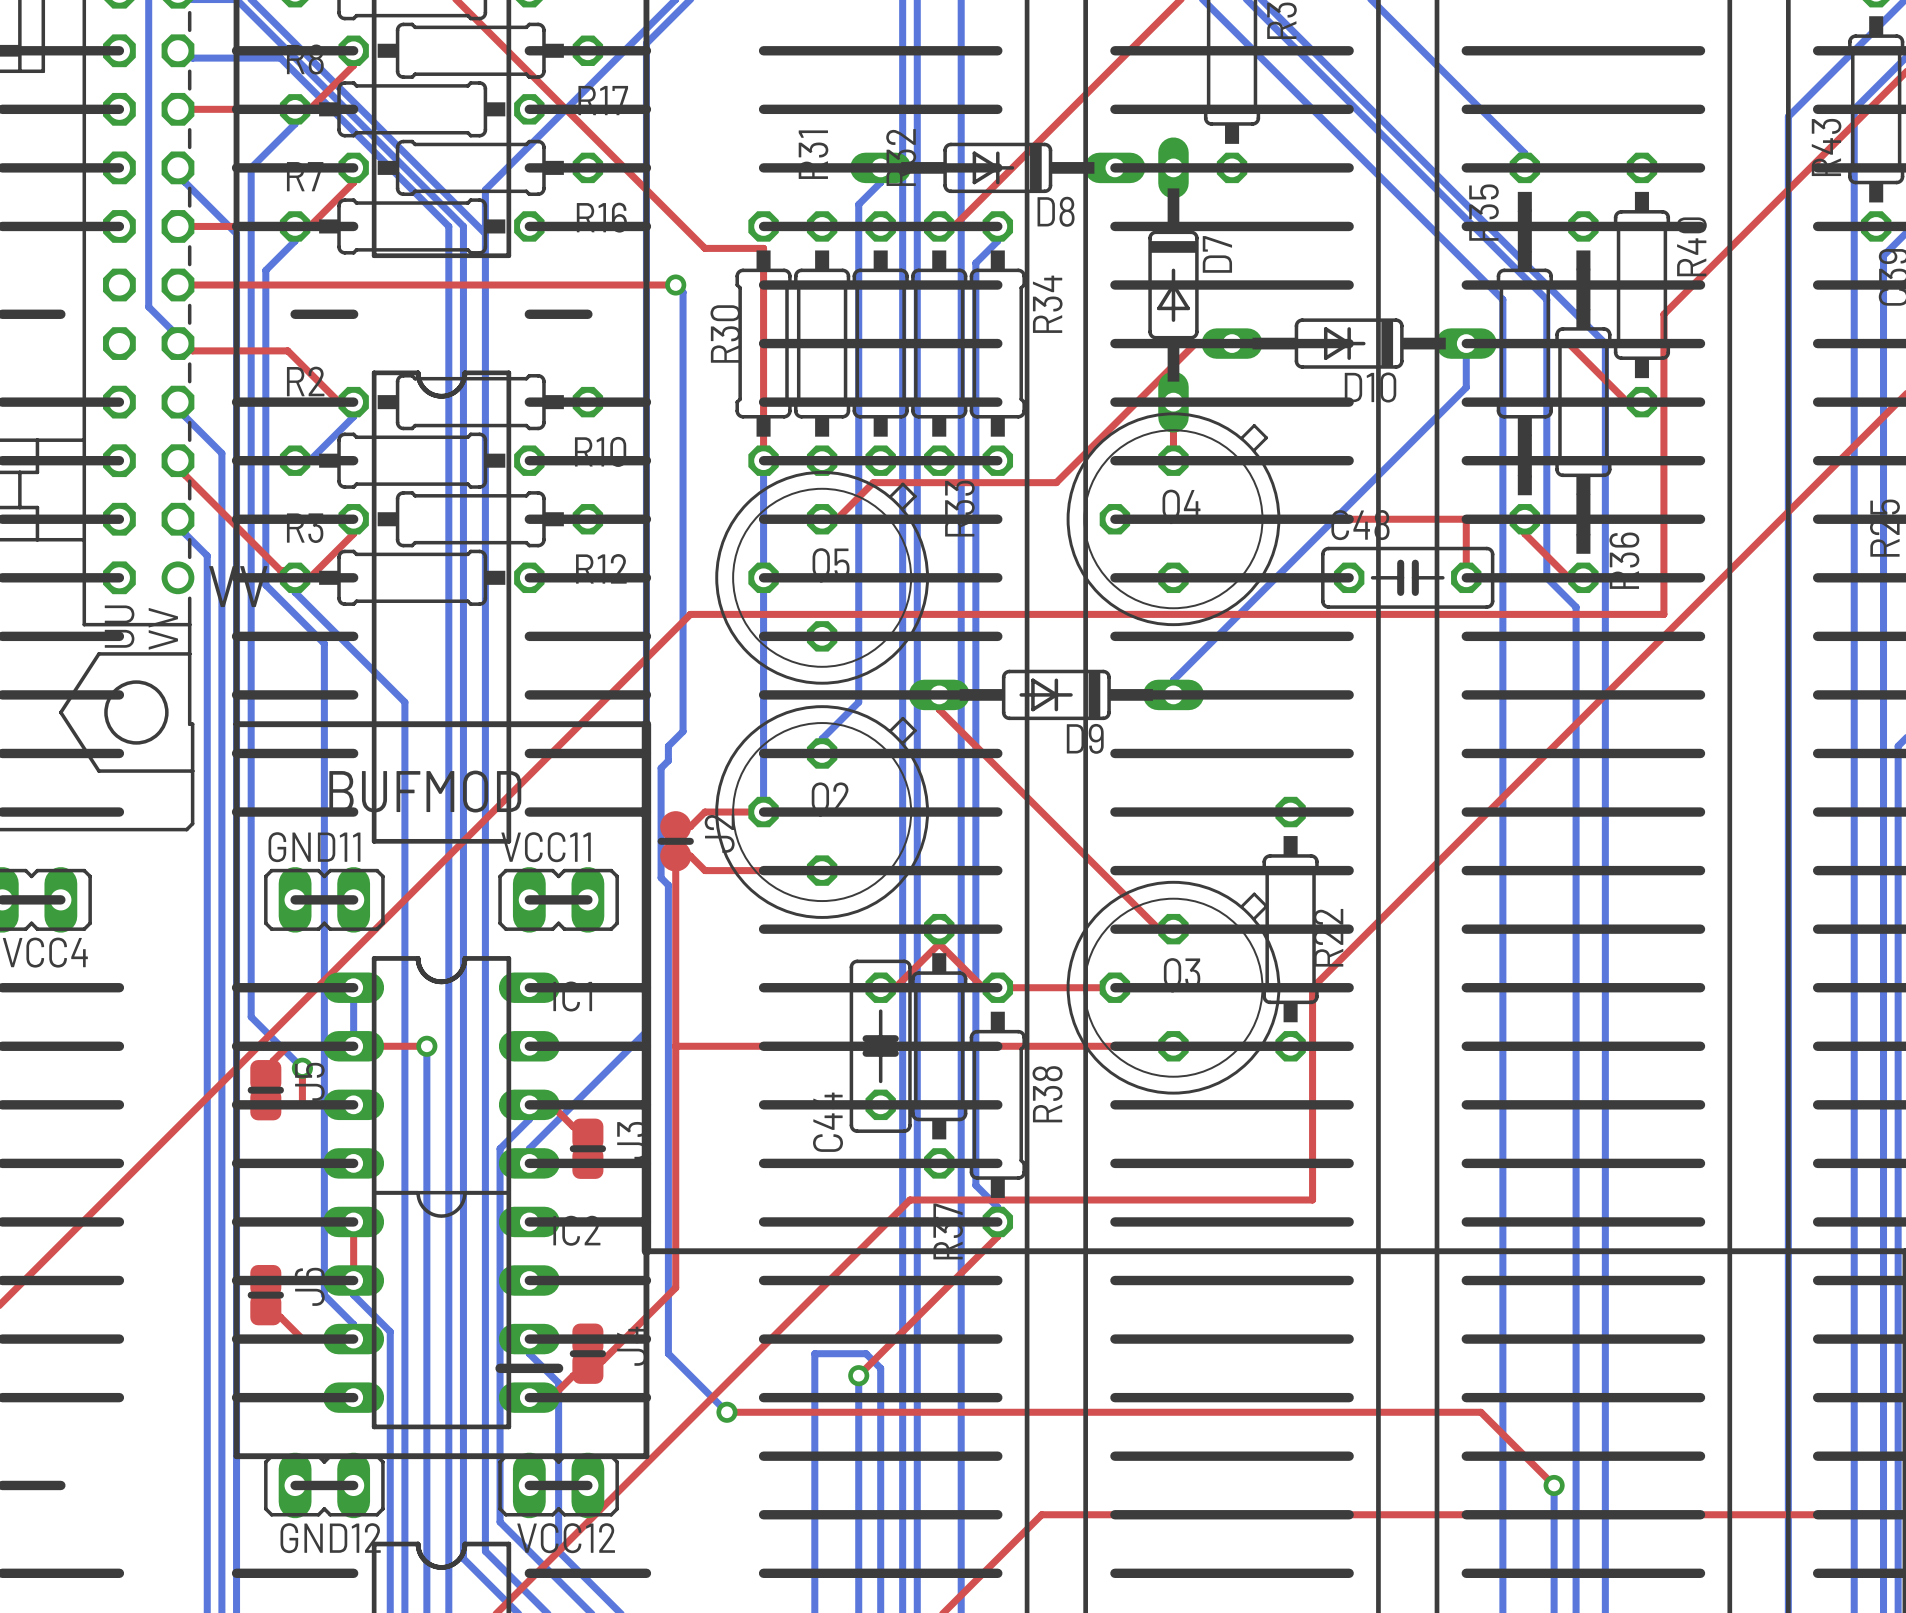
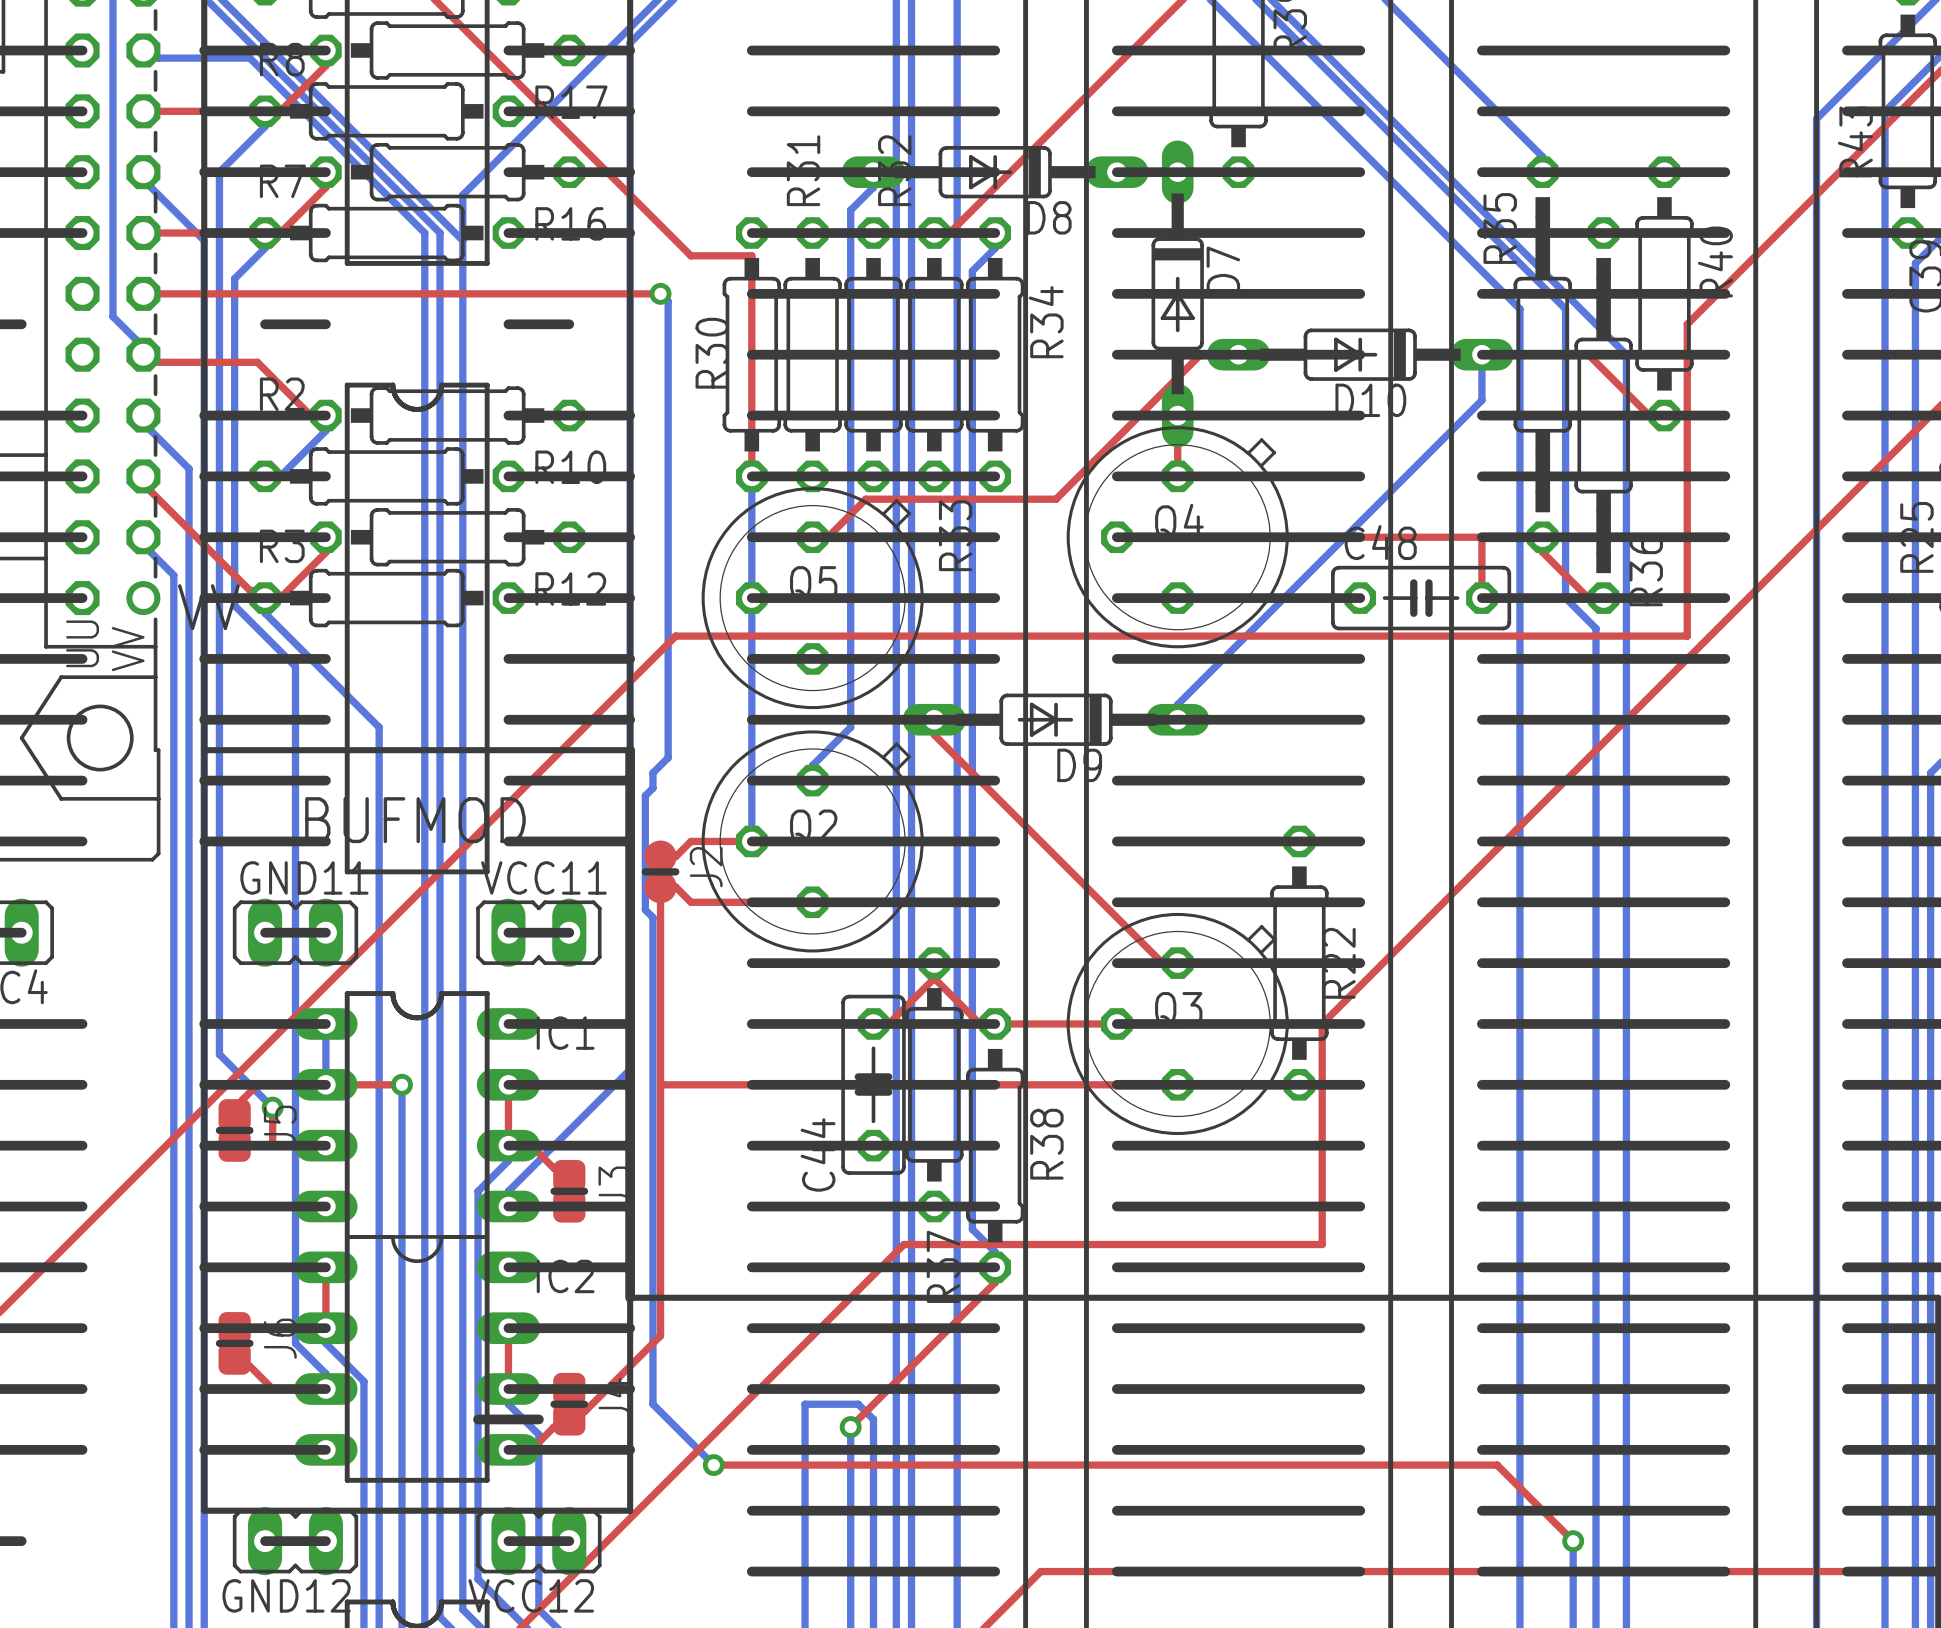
top track: none -> (508, 1084) (508, 1145)
top track: none -> (508, 1328) (508, 1389)

